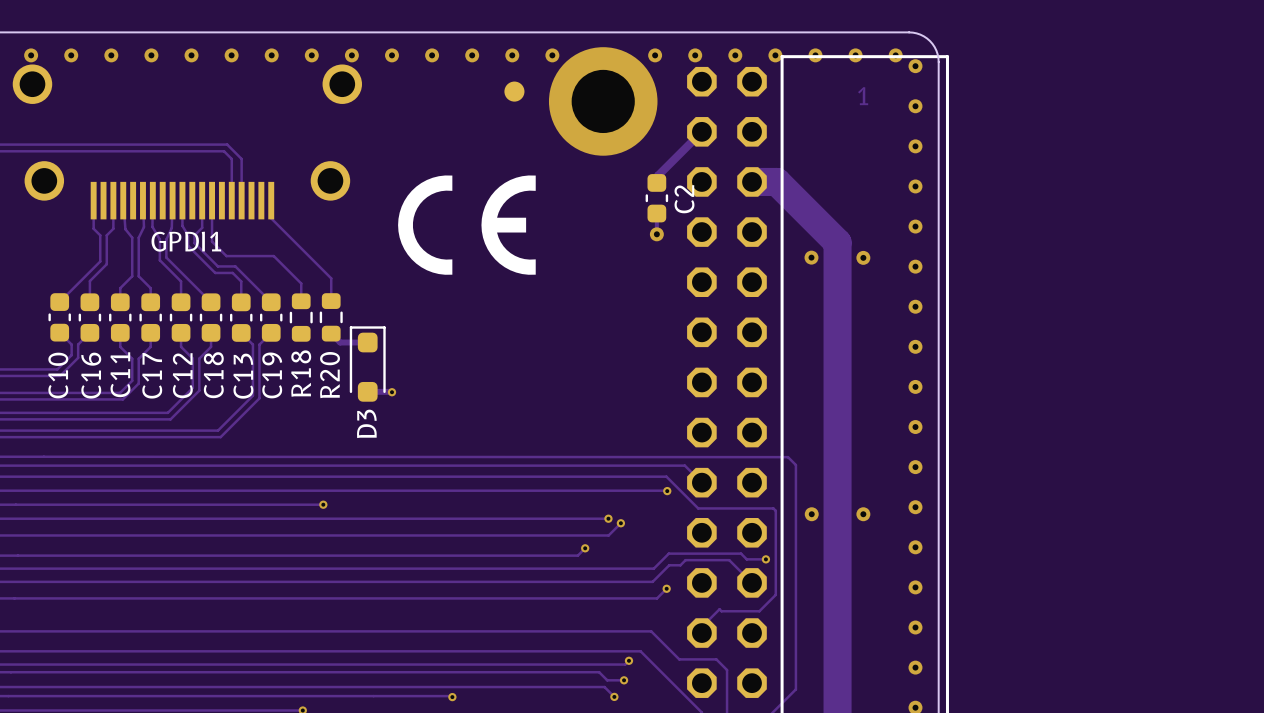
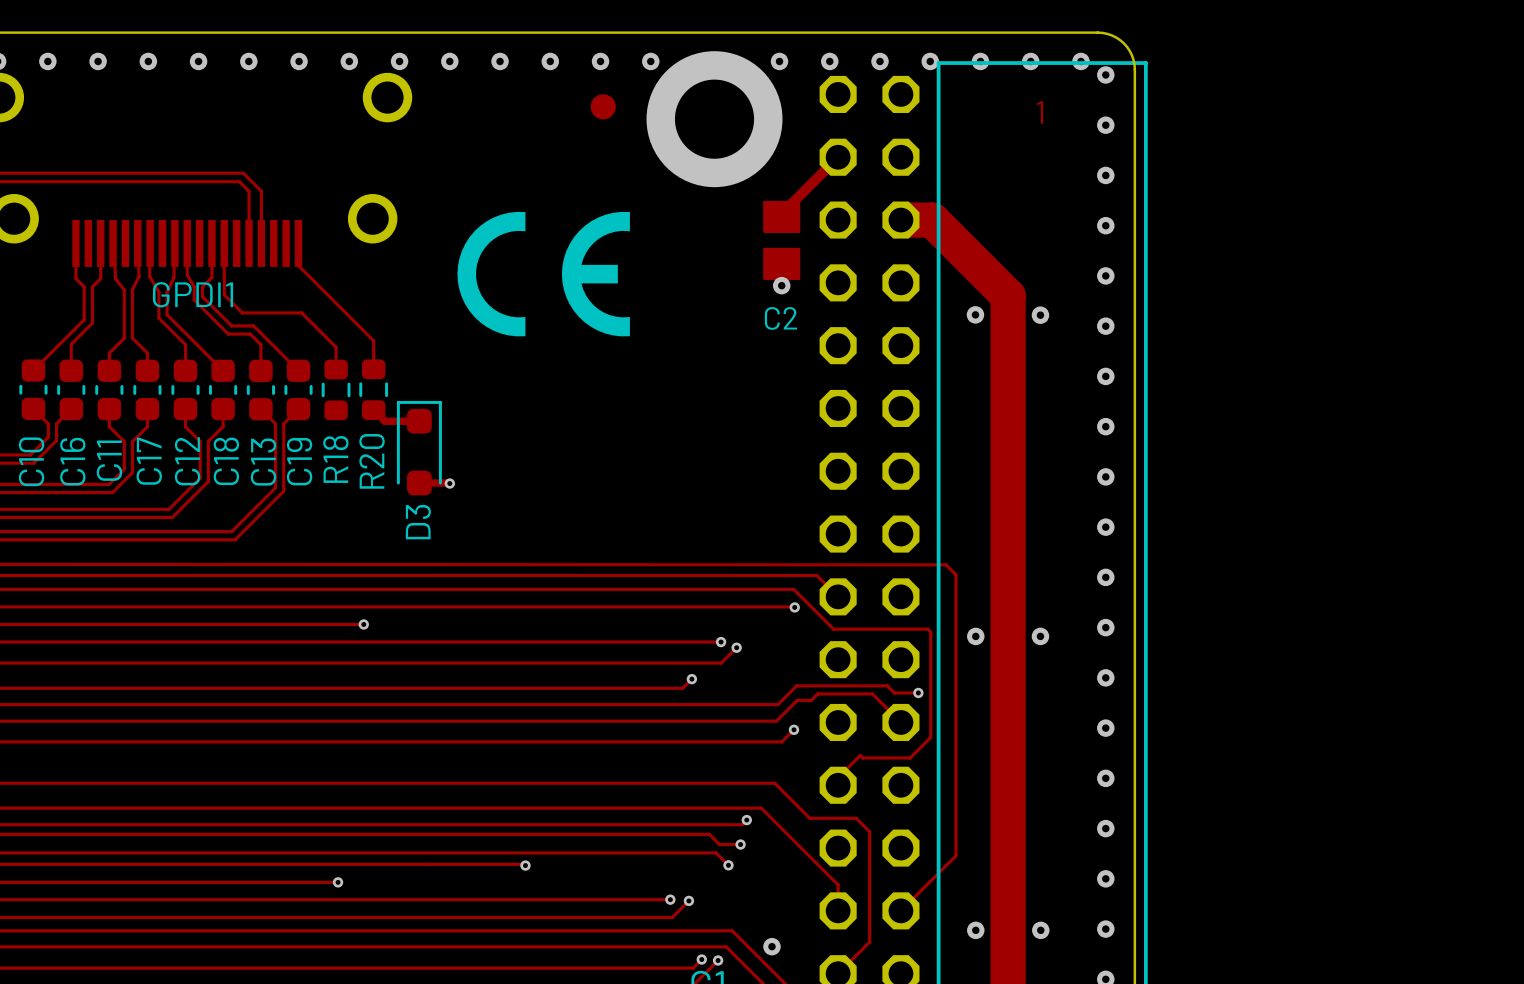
C2 footprint: [645, 174, 669, 223] -> [763, 200, 801, 281]
C2 name position: C2 (684, 199) -> C2 (780, 318)

